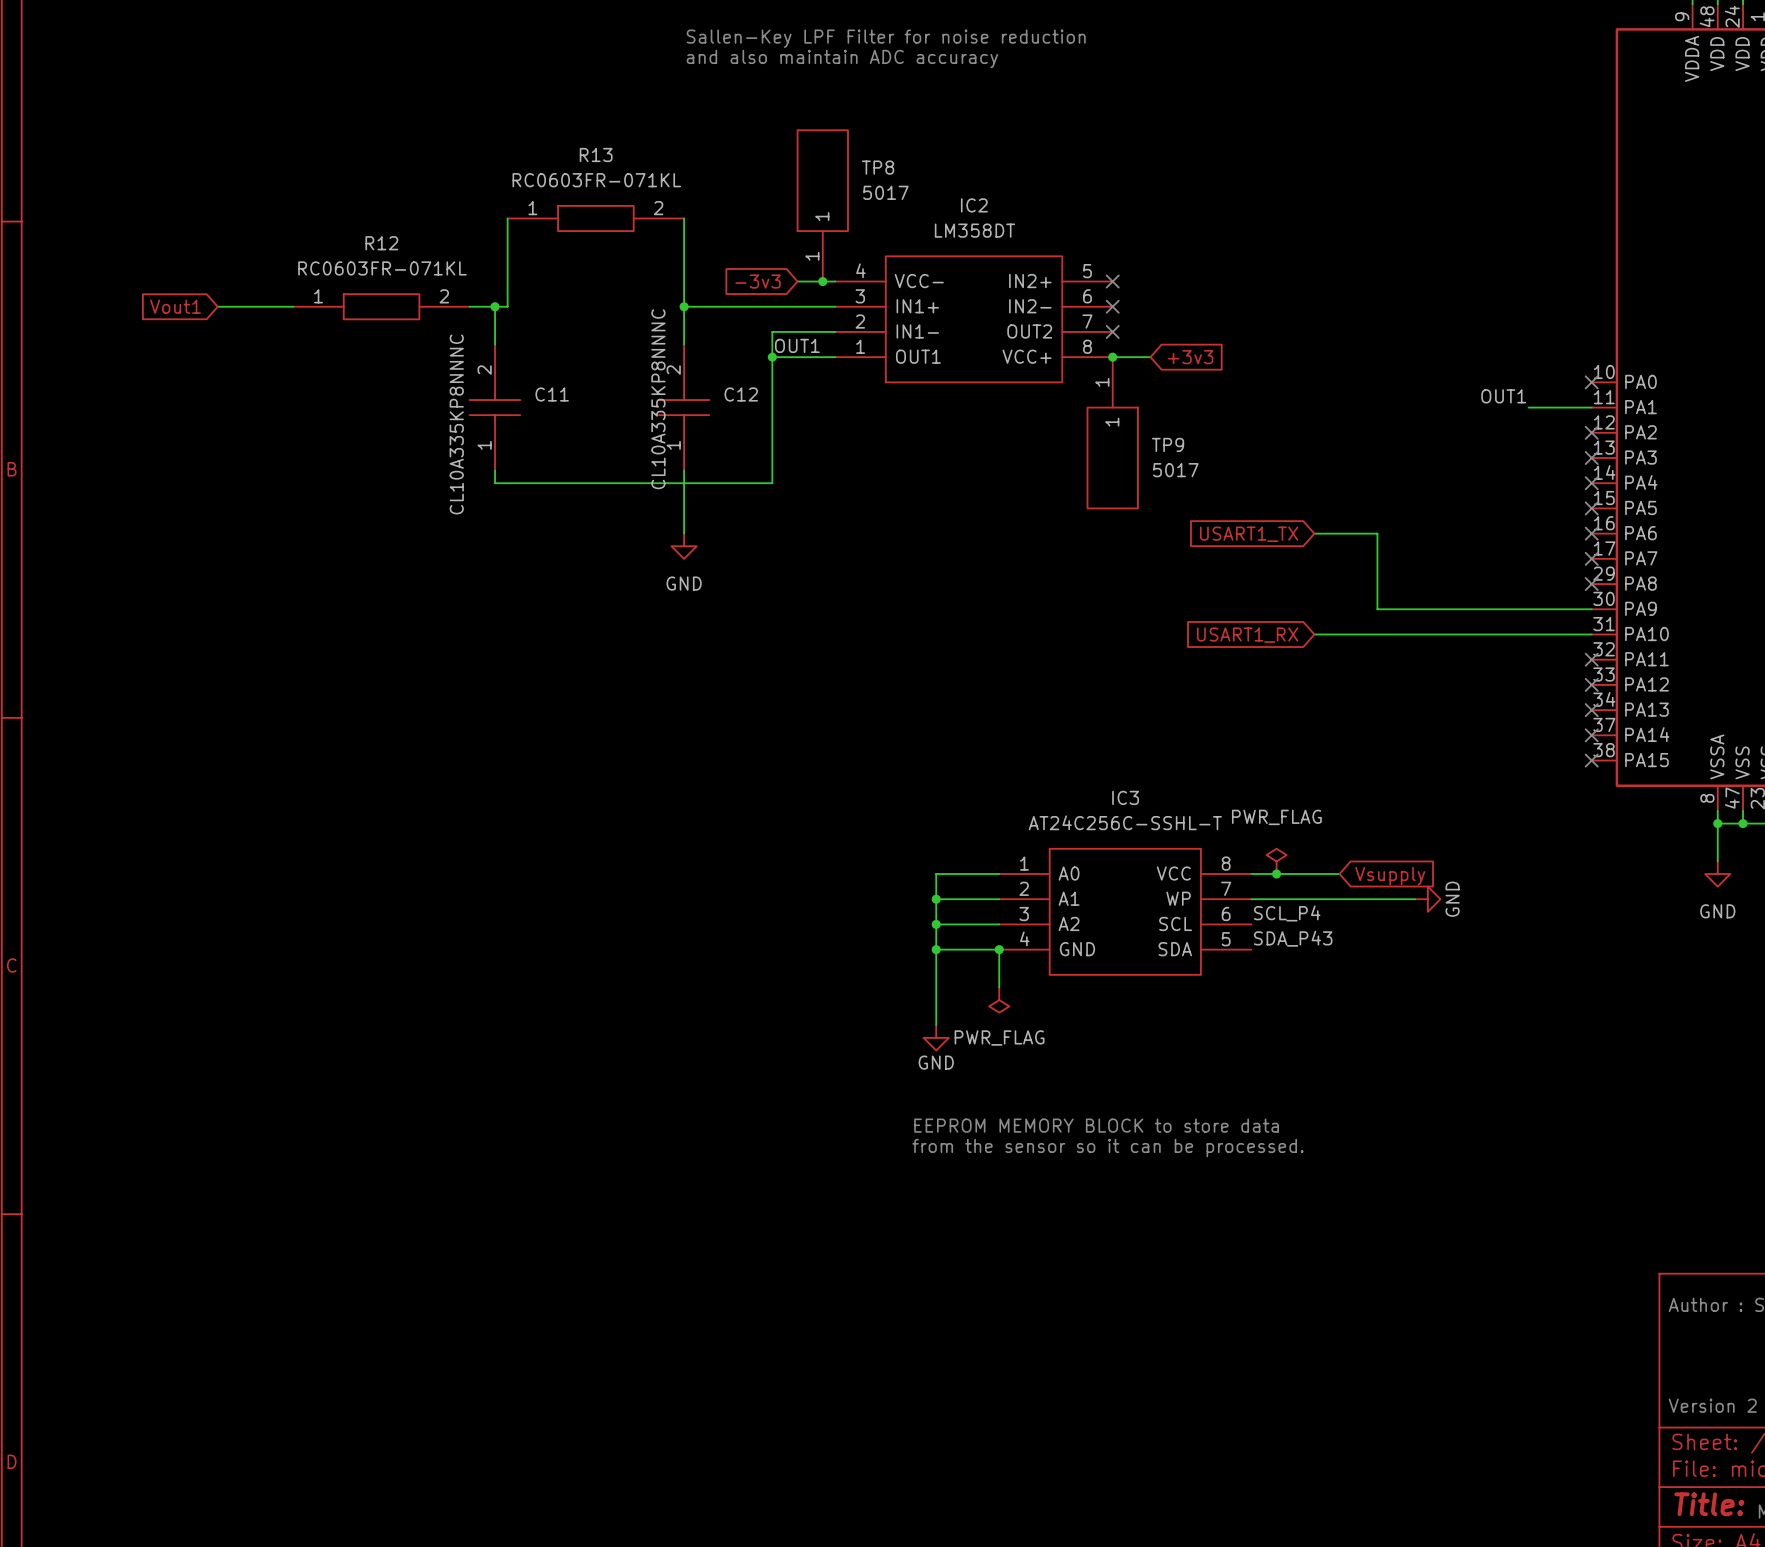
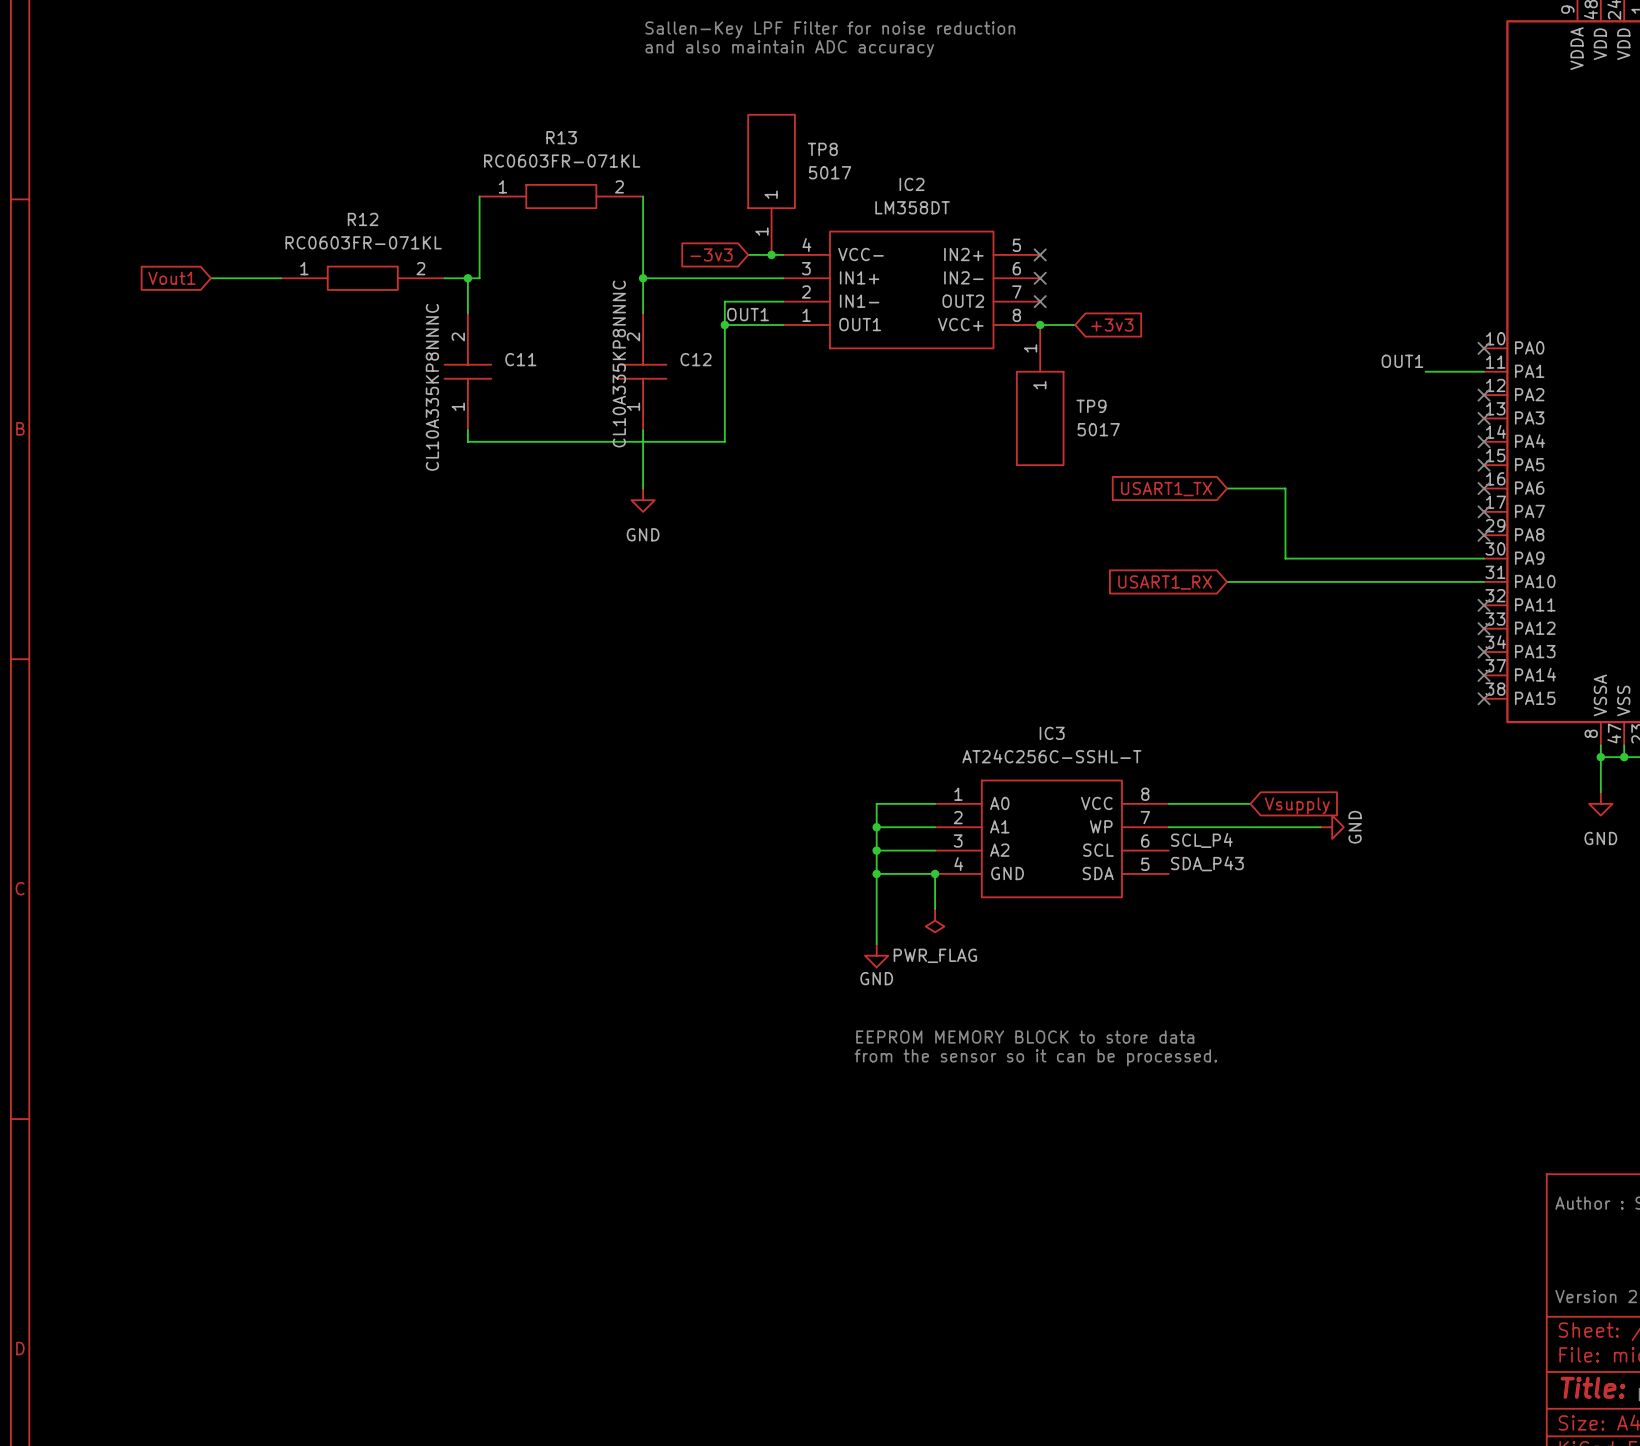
power symbol: PWR_FLAG (1276, 861) -> none
junction: (1276, 874) -> none

